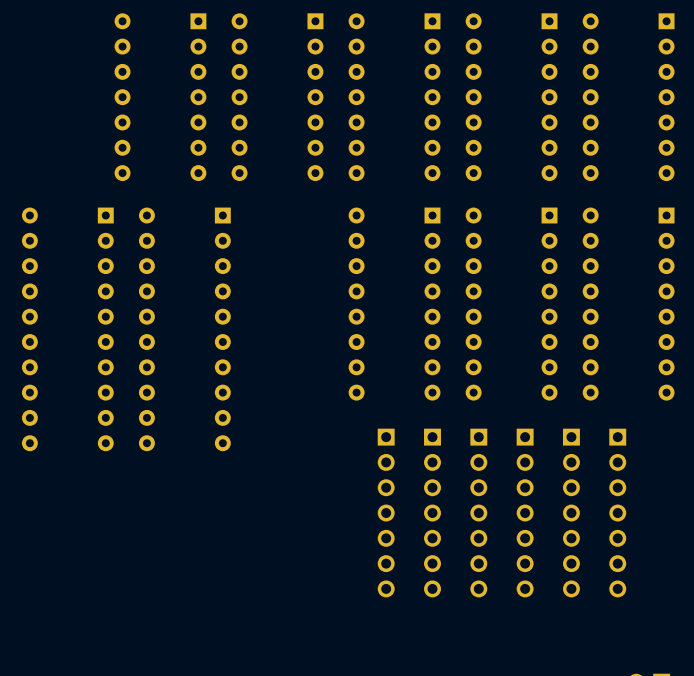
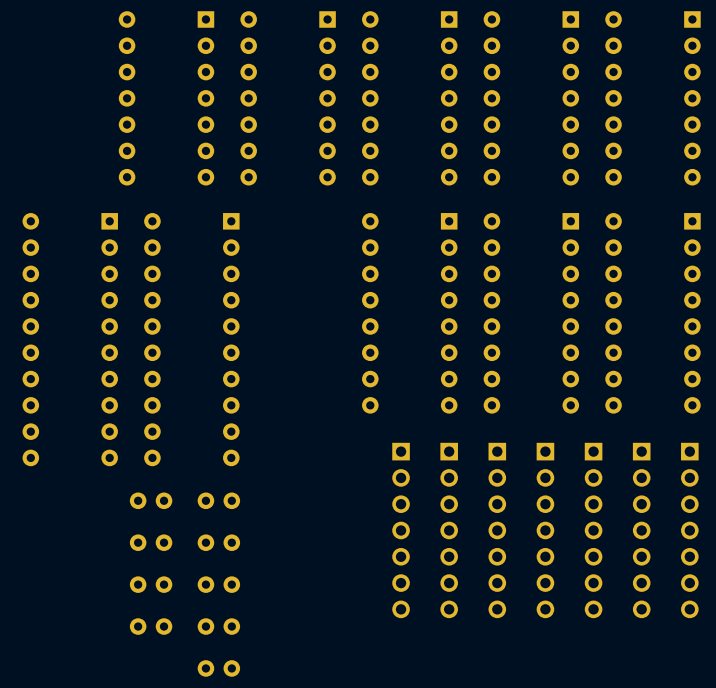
part: none -> (151, 500)
part: none -> (218, 500)
part: none -> (689, 530)
part: none -> (151, 542)
part: none -> (218, 542)
part: none -> (151, 584)
part: none -> (218, 584)
part: none -> (151, 626)
part: none -> (218, 626)
part: none -> (218, 668)

